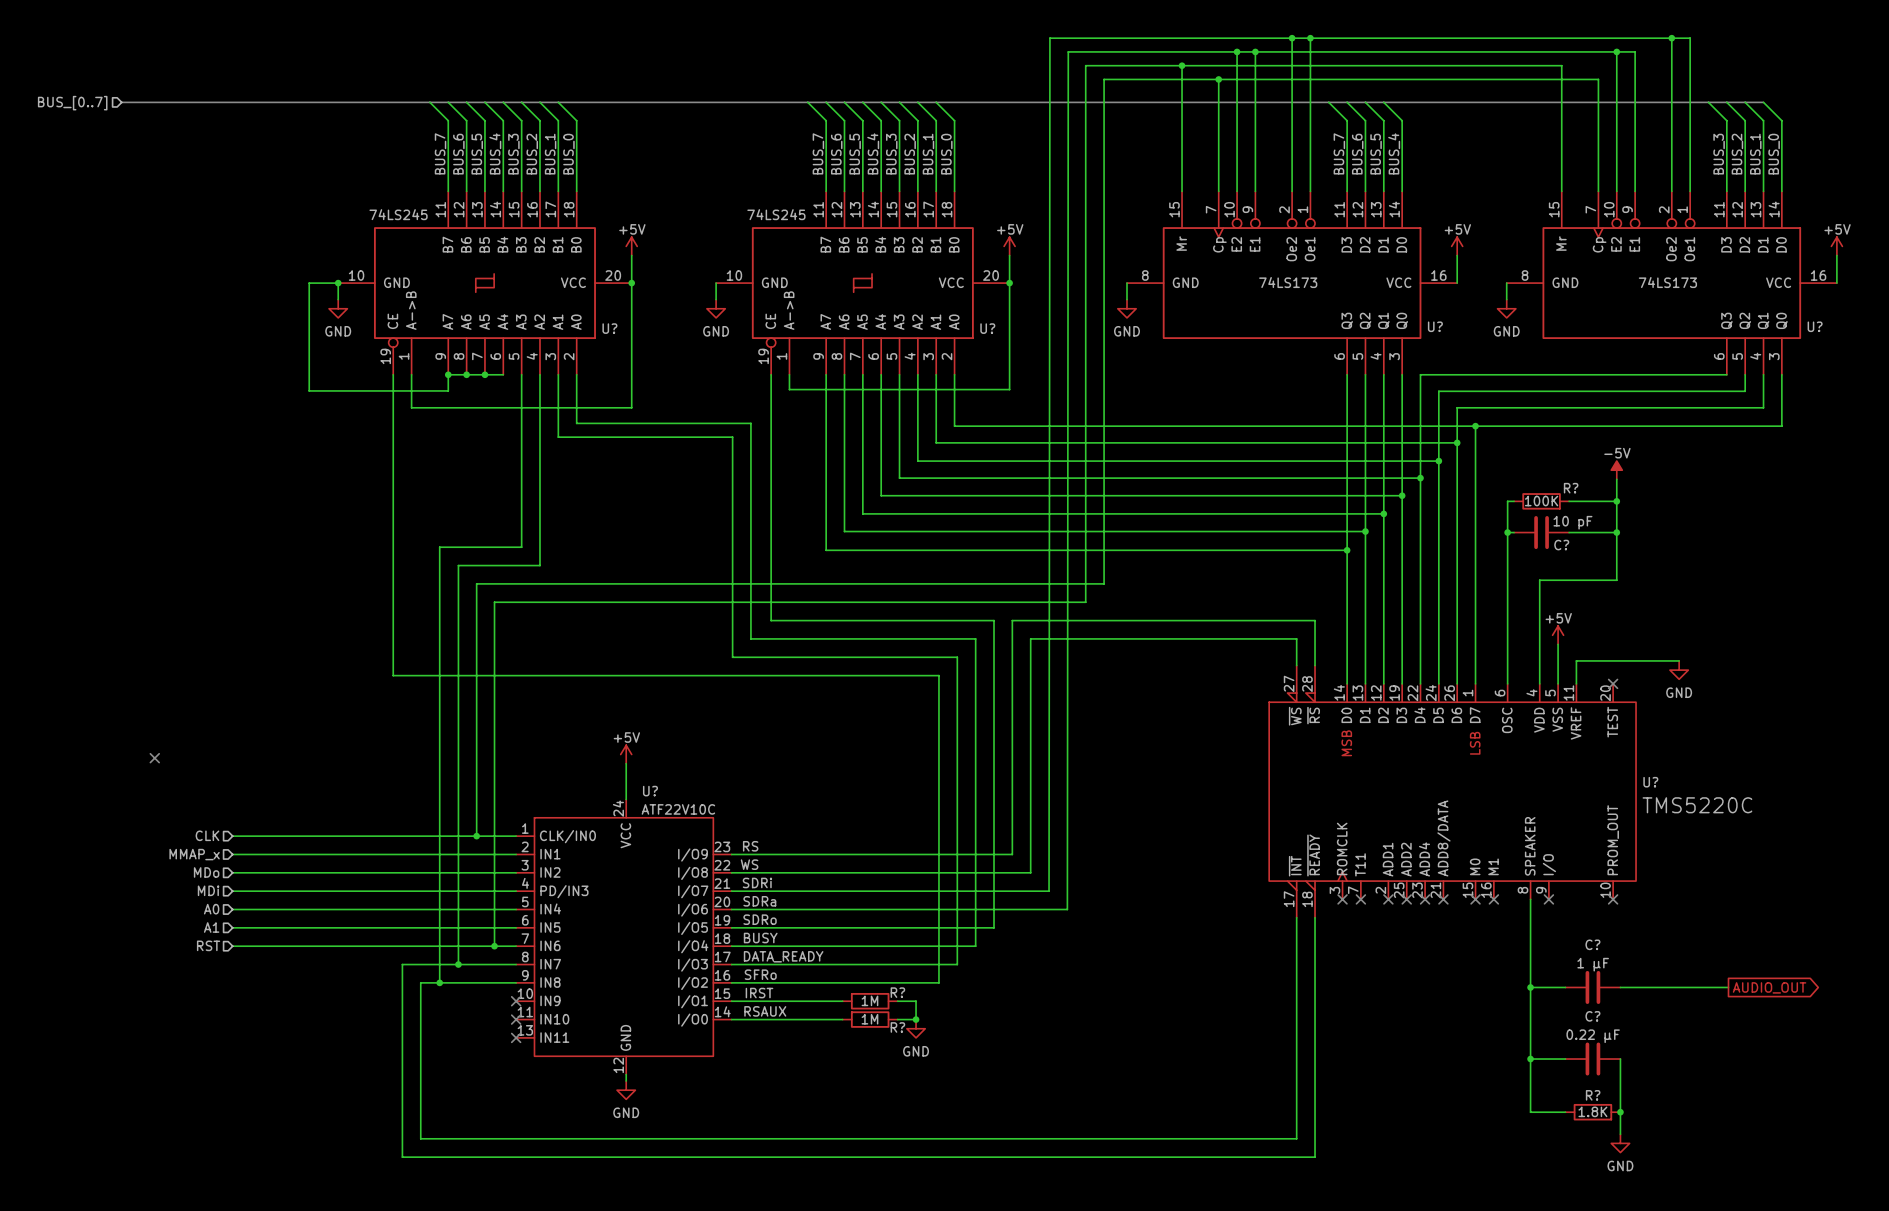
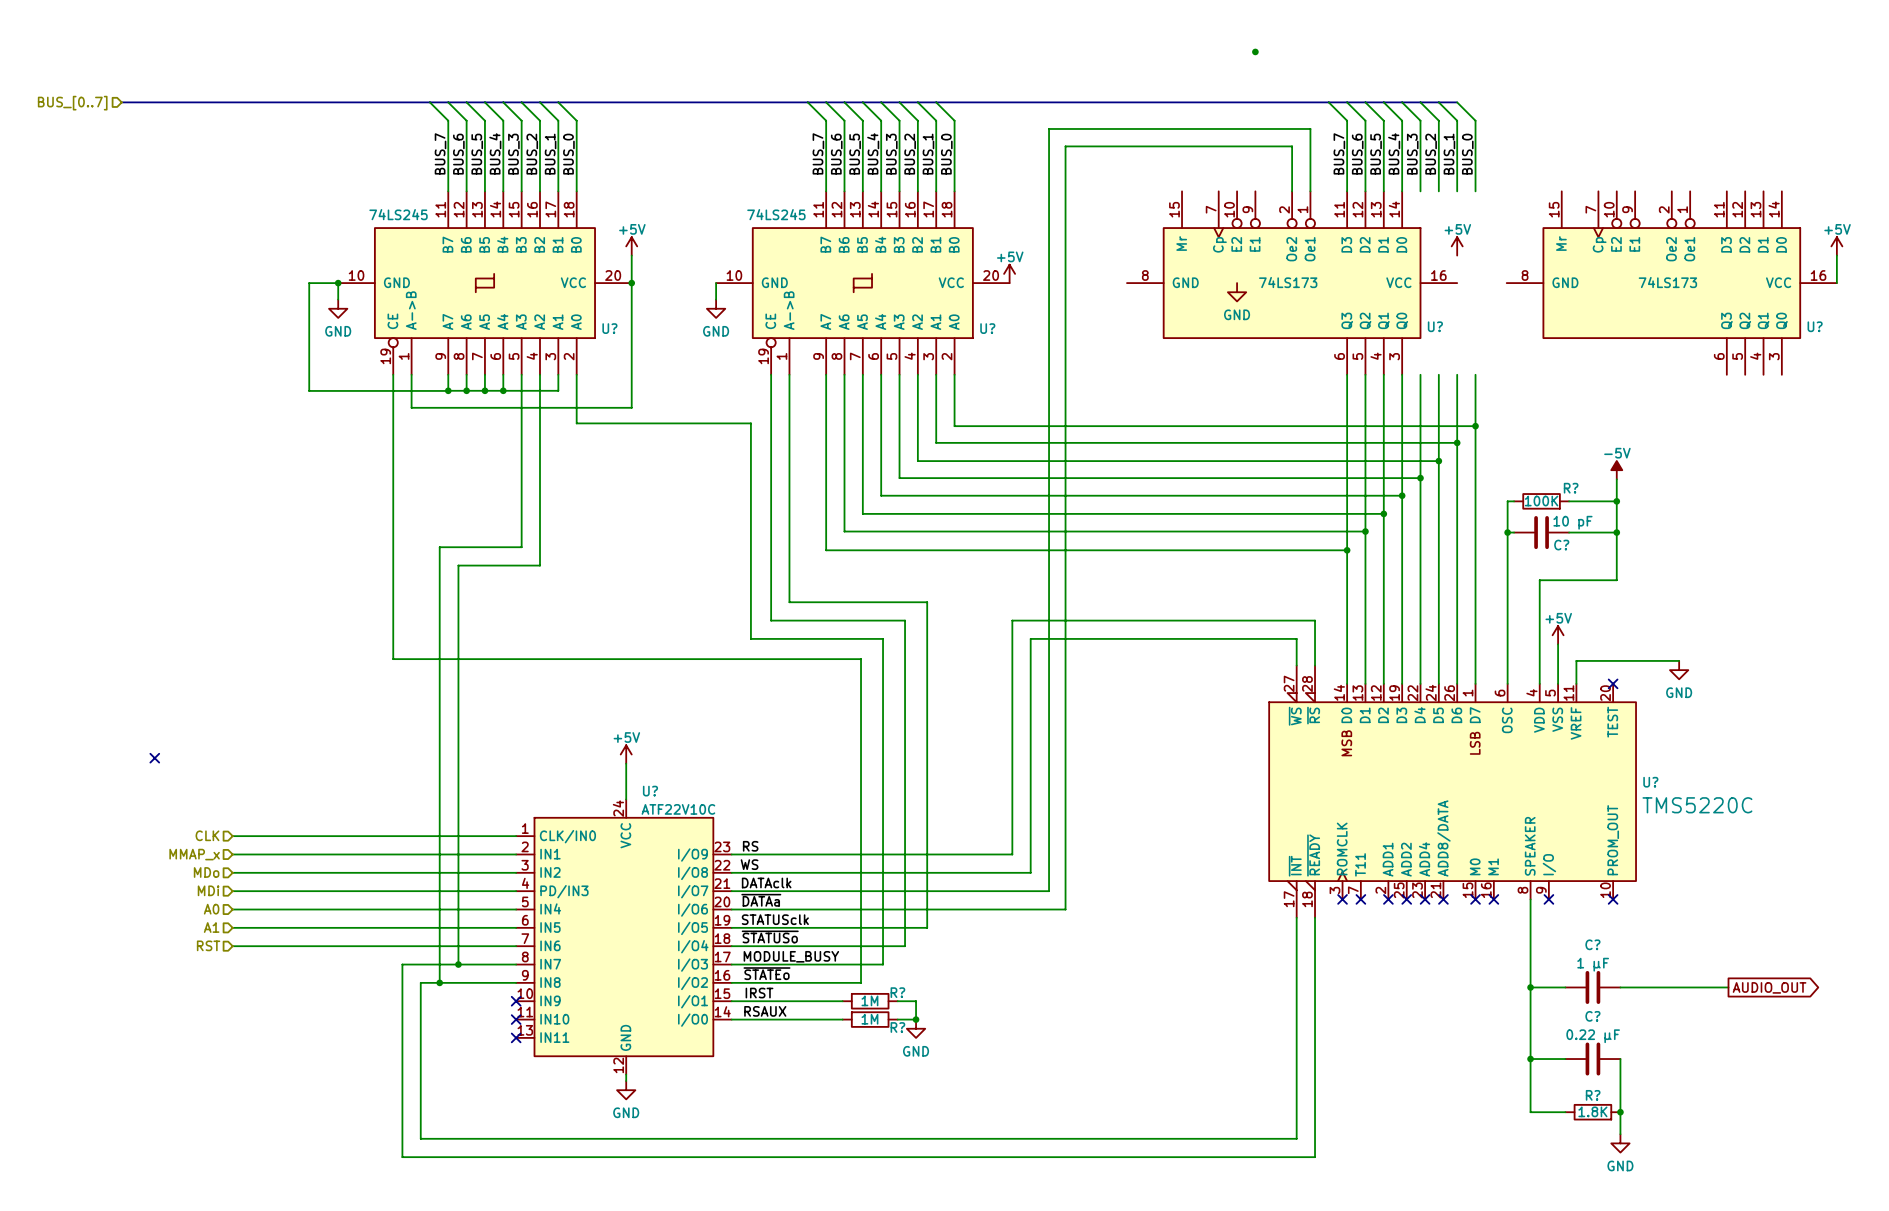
wire: (1292, 38) (1292, 146) -> none
junction: (1292, 38) -> none
wire: (1310, 38) (1310, 128) -> none
junction: (1310, 38) -> none
wire: (1671, 38) (1671, 191) -> none
junction: (1671, 38) -> none
wire: (1237, 51) (1237, 191) -> none
junction: (1237, 51) -> none
wire: (1255, 51) (1255, 191) -> none
wire: (1616, 51) (1616, 191) -> none
junction: (1616, 51) -> none
wire: (1182, 65) (1182, 191) -> none
junction: (1182, 65) -> none
wire: (1218, 79) (1218, 191) -> none
junction: (1218, 79) -> none
wire: none -> (1402, 102) (1420, 120) (1420, 191)
wire: none -> (1420, 102) (1438, 120) (1438, 191)
wire: none -> (1438, 102) (1457, 120) (1457, 191)
wire: none -> (1457, 102) (1475, 120) (1475, 191)
bus: (1457, 102) (1763, 102) -> none
wire: (1708, 102) (1726, 120) (1726, 191) -> none
wire: (1726, 102) (1745, 120) (1745, 191) -> none
wire: (1745, 102) (1763, 120) (1763, 191) -> none
wire: (1763, 102) (1781, 120) (1781, 191) -> none
label: none -> BUS_3 (1412, 154)
label: none -> BUS_2 (1431, 154)
label: none -> BUS_1 (1449, 154)
label: none -> BUS_0 (1467, 154)
label: BUS_3 (1719, 154) -> none
label: BUS_2 (1737, 154) -> none
label: BUS_1 (1755, 154) -> none
label: BUS_0 (1774, 154) -> none
wire: (1561, 191) (1561, 65) (1085, 65) (1085, 602) (927, 602) -> none
wire: (1598, 191) (1598, 79) (1104, 79) (1104, 583) (476, 583) (476, 836) -> none
wire: (1635, 191) (1635, 51) (1068, 51) (1067, 909) (1065, 909) -> (1292, 146) (1065, 146) (1065, 909)
wire: (1690, 191) (1690, 38) (1049, 38) (1049, 891) -> (1310, 128) (1049, 128) (1049, 891)
power symbol position: +5V (1009, 246) -> +5V (1009, 273)
wire: (1009, 255) (1009, 389) (789, 389) -> (789, 602) (789, 389)
wire: (1457, 255) (1457, 283) -> none
junction: (1009, 283) -> none
wire: (1126, 283) (1126, 299) -> none
wire: (1506, 283) (1506, 299) -> none
power symbol position: GND (1126, 308) -> GND (1237, 292)
power symbol: GND (1506, 308) -> none
wire: (448, 374) (503, 374) -> (503, 390) (503, 374)
junction: (448, 374) -> none
wire: none -> (466, 374) (466, 390)
junction: (466, 374) -> none
wire: none -> (484, 374) (484, 390)
junction: (484, 374) -> none
wire: (1420, 374) (1726, 374) -> none
wire: (1745, 374) (1745, 391) (1438, 391) -> (1438, 374) (1438, 391)
wire: (1763, 374) (1763, 407) (1457, 407) -> (1457, 374) (1457, 407)
wire: (1781, 374) (1781, 426) (1475, 426) -> (1475, 374) (1475, 426)
wire: none -> (448, 390) (558, 390)
junction: none -> (448, 390)
junction: none -> (466, 390)
junction: none -> (484, 390)
junction: none -> (503, 390)
wire: (558, 390) (558, 437) (732, 437) (732, 657) (957, 657) (957, 964) (883, 964) -> (883, 638) (883, 964)
wire: (789, 602) (494, 602) (494, 946) -> none
wire: (905, 620) (994, 620) (994, 927) (927, 927) -> (927, 602) (927, 927)
wire: (883, 638) (975, 638) (975, 946) (905, 946) -> (905, 620) (905, 946)
wire: (393, 659) (393, 675) (938, 675) (938, 982) (861, 982) -> (393, 659) (861, 659) (861, 982)
junction: (476, 836) -> none
label: SDRi (757, 882) -> none
label: none -> DATAclk (766, 882)
label: SDRa (759, 901) -> ~{DATAa} (761, 900)
label: SDRo (760, 919) -> none
label: none -> STATUSclk (775, 919)
label: none -> ~{STATUSo} (770, 936)
label: BUSY (760, 938) -> none
junction: (494, 946) -> none
label: DATA_READY (783, 956) -> none
label: none -> MODULE_BUSY (791, 956)
label: none -> ~{STATEo} (766, 973)
label: SFRo (760, 974) -> none

